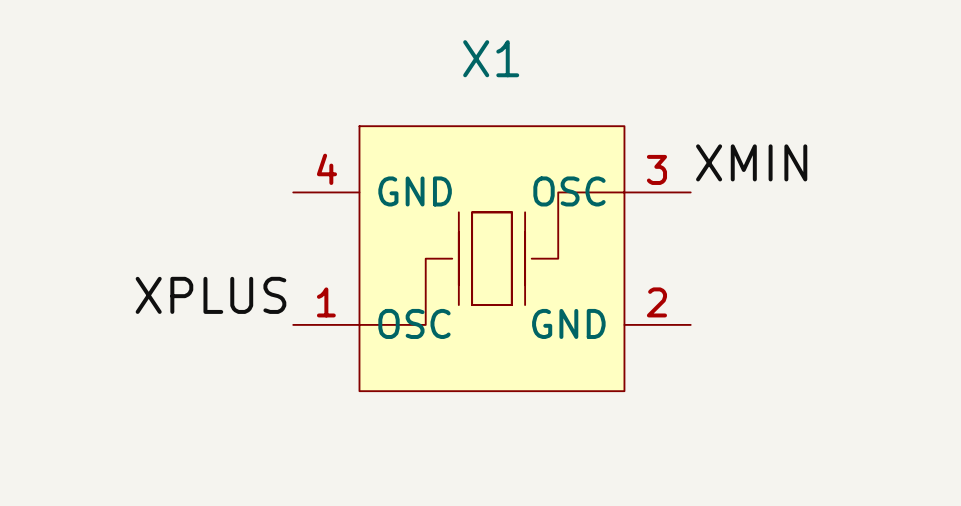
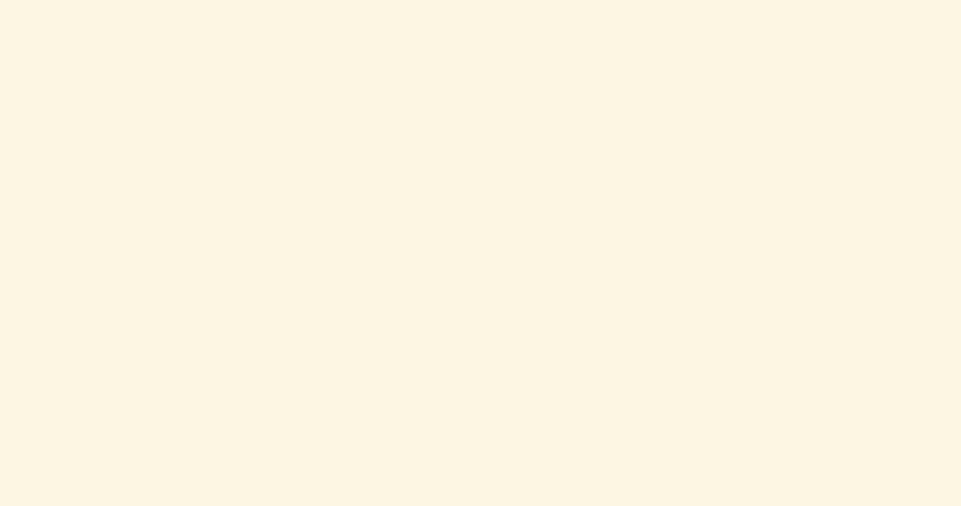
label: XMIN (751, 162) -> none
X1: (491, 258) -> none
label: XPLUS (210, 295) -> none

